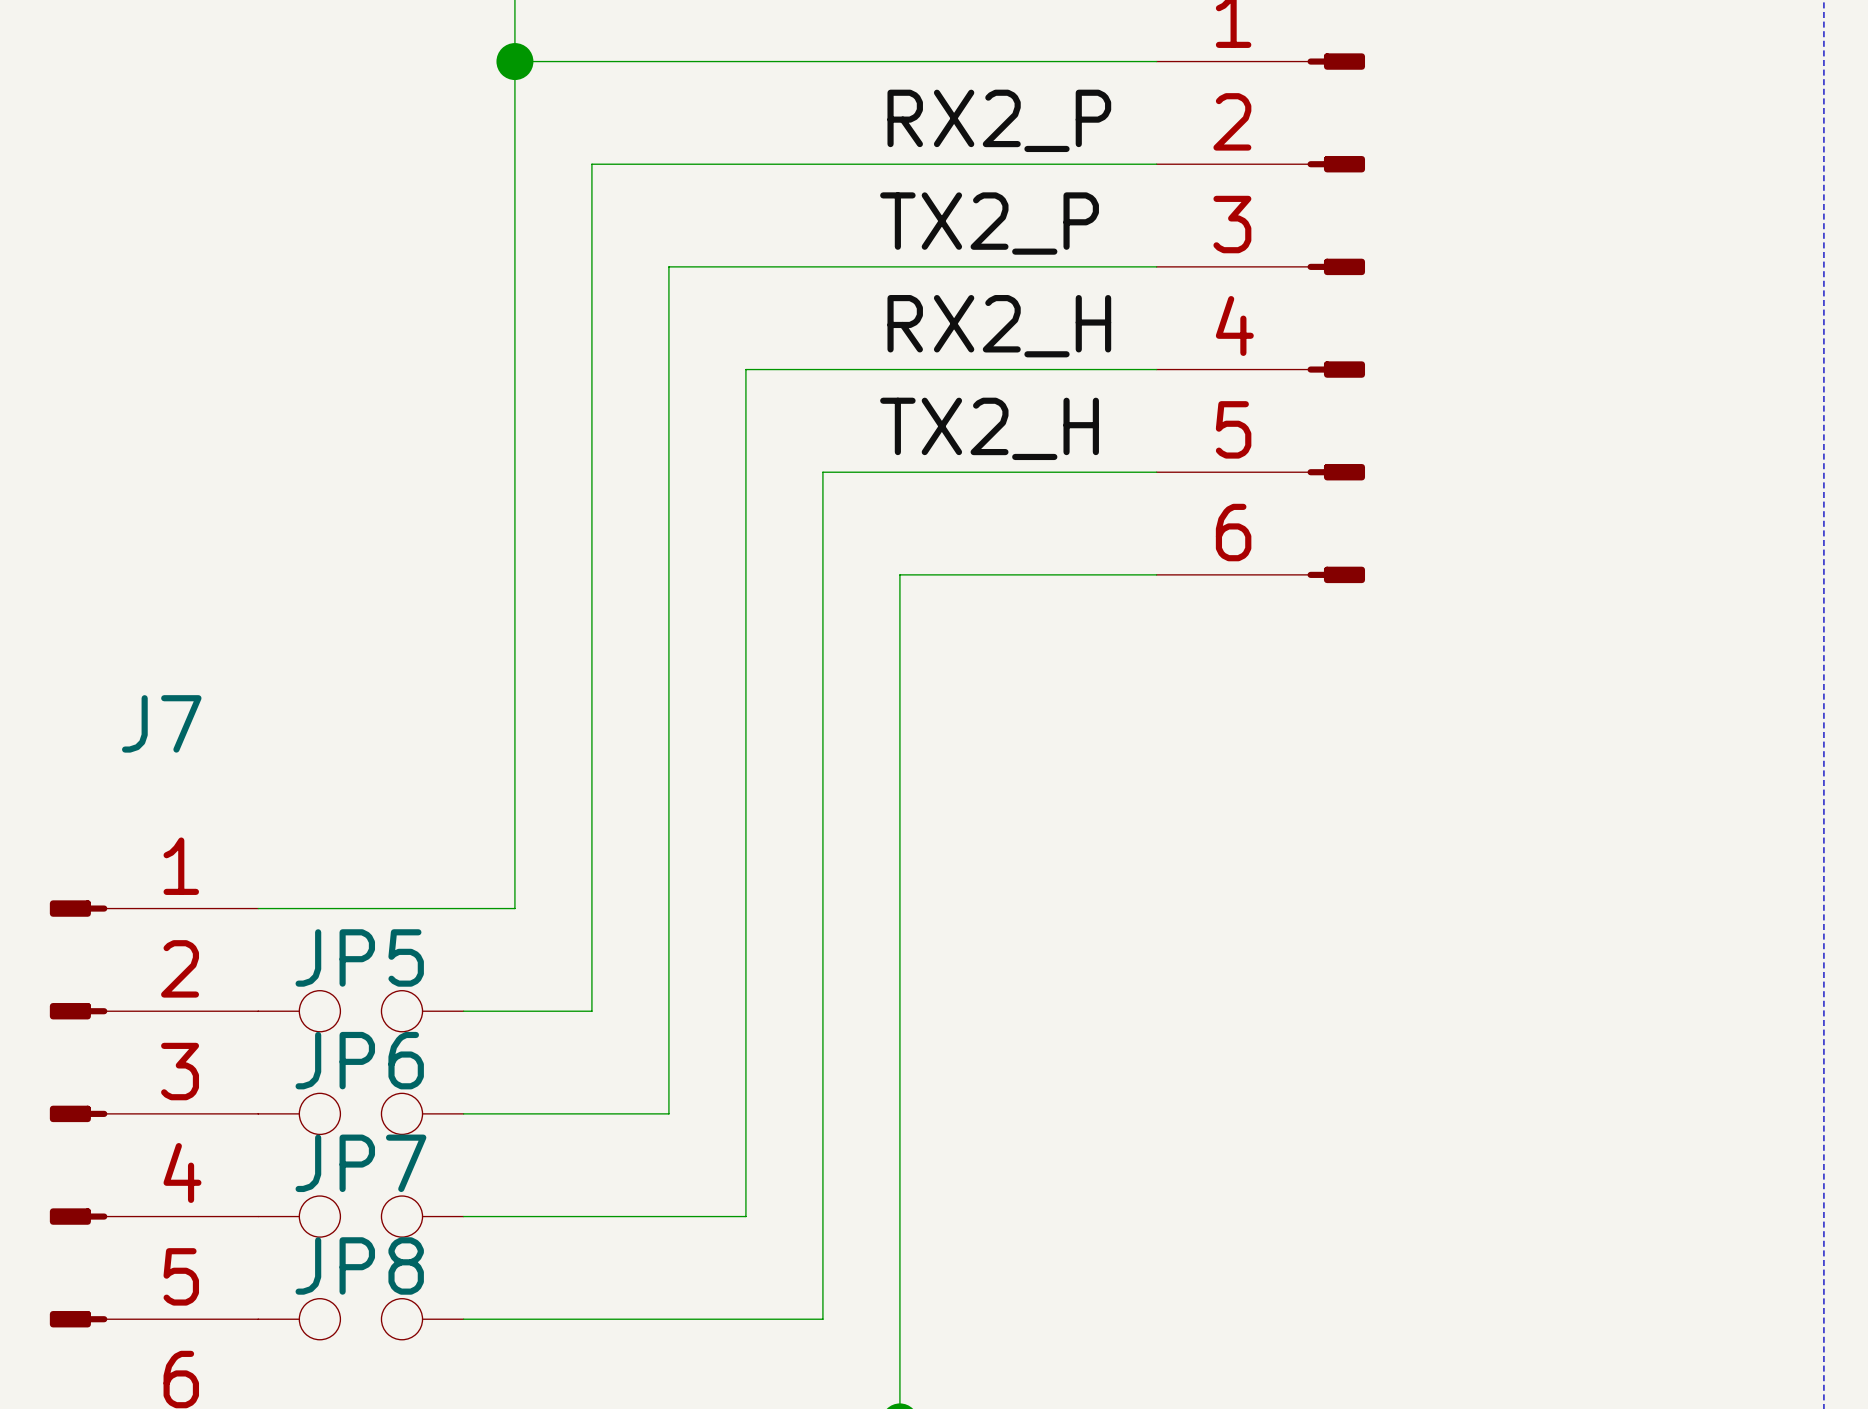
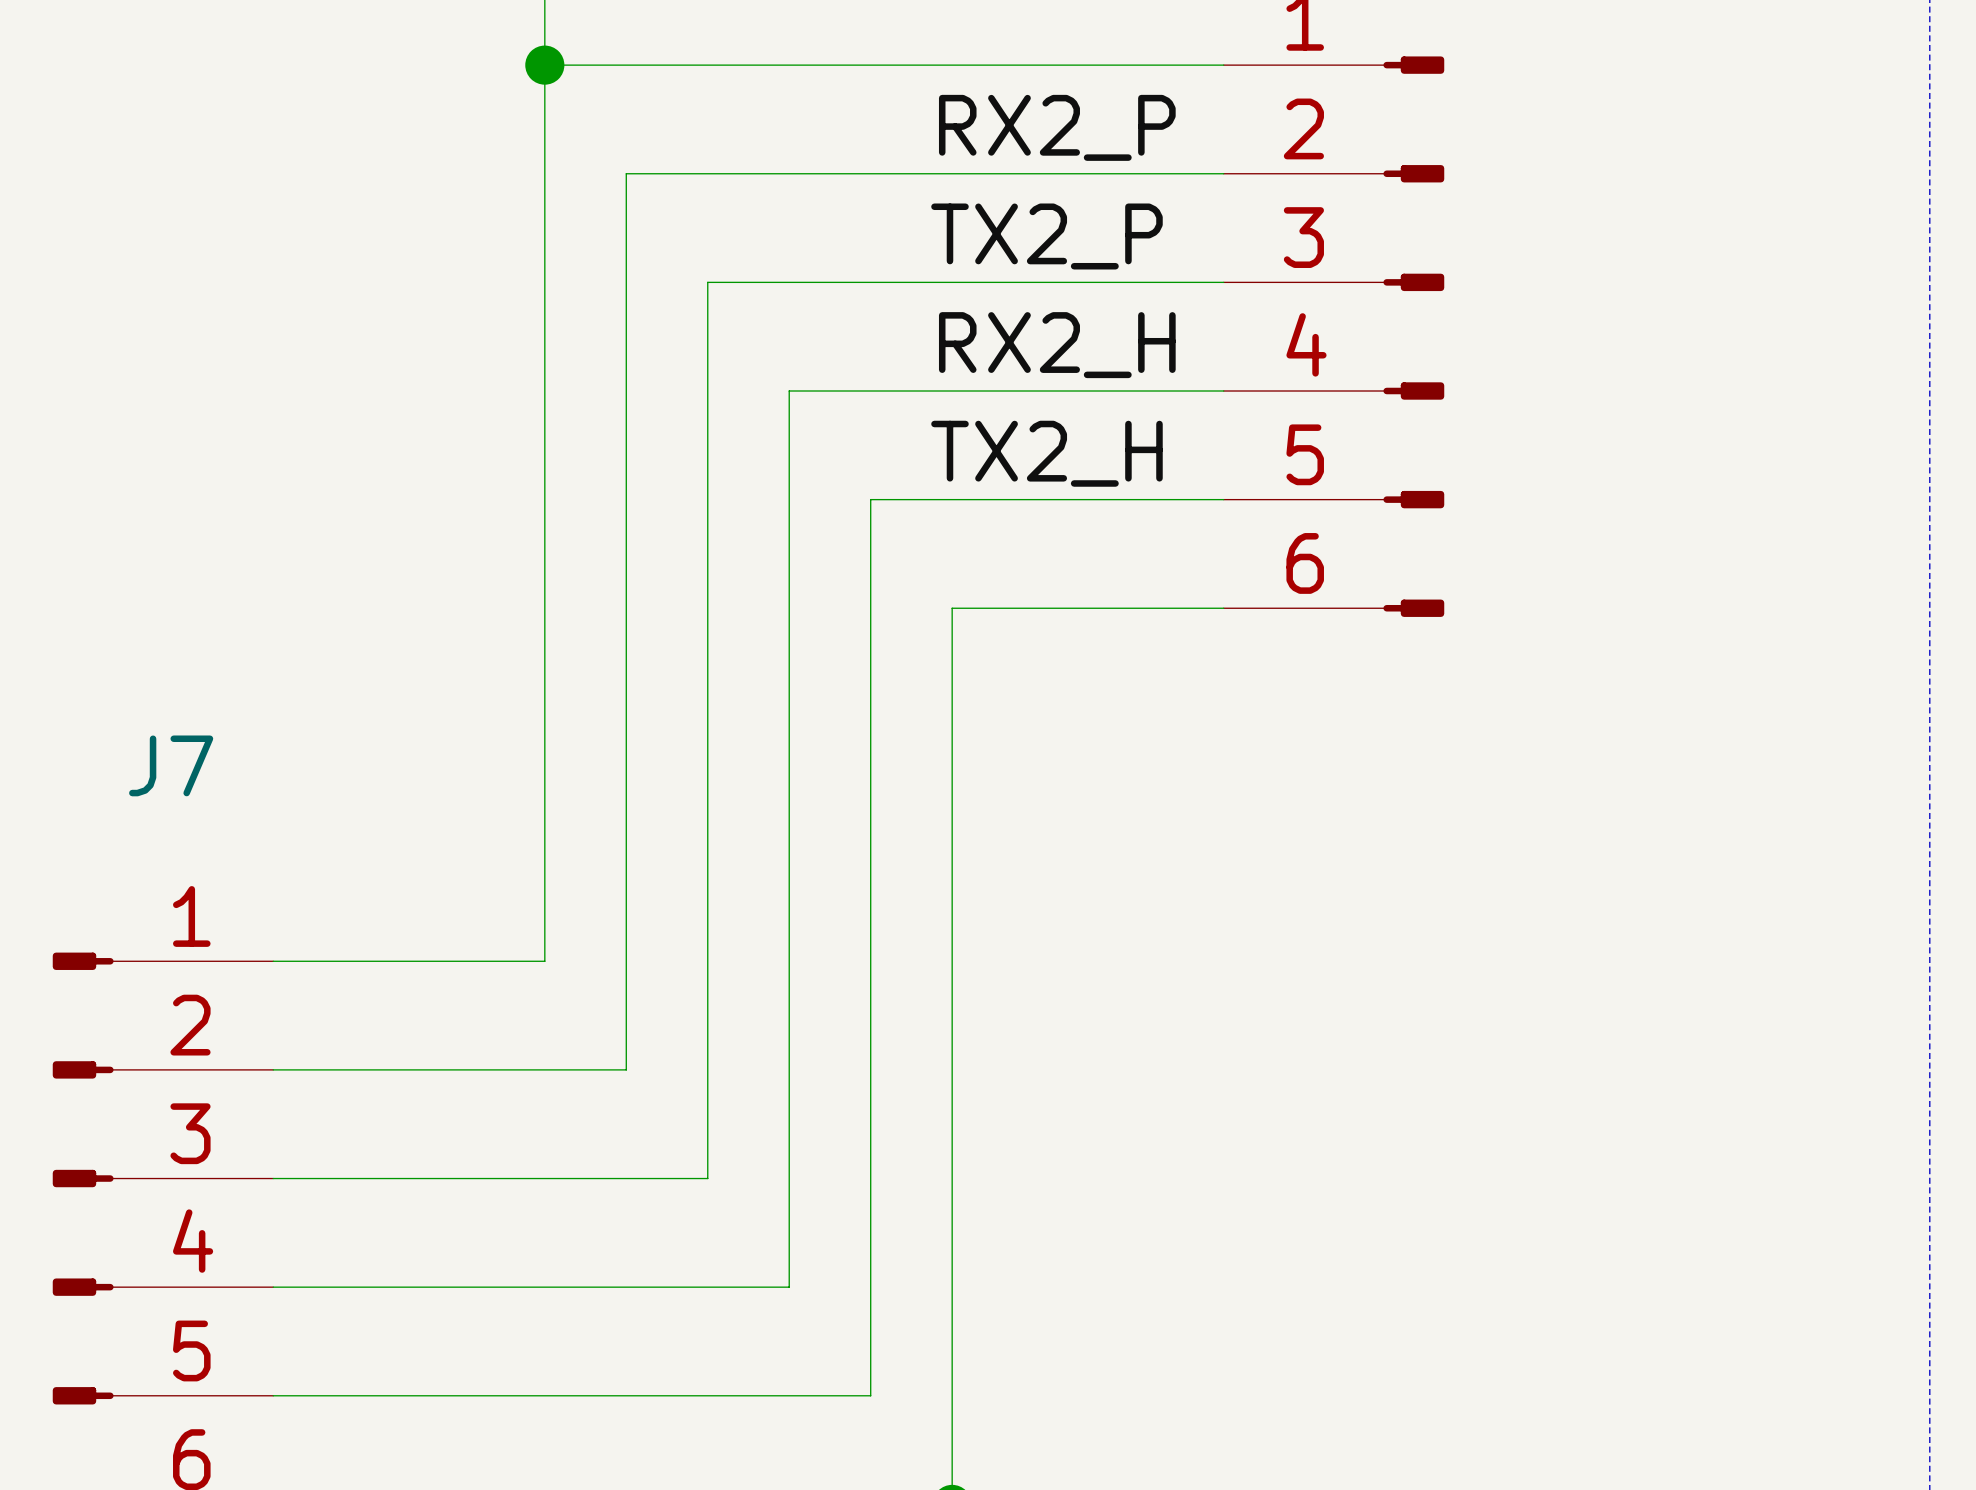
wire: none -> (273, 1069) (490, 1069)
JP5: (360, 1011) -> none
wire: none -> (273, 1178) (490, 1178)
JP6: (360, 1113) -> none
wire: none -> (273, 1287) (490, 1287)
JP7: (360, 1216) -> none
wire: none -> (273, 1395) (490, 1395)
JP8: (360, 1319) -> none

